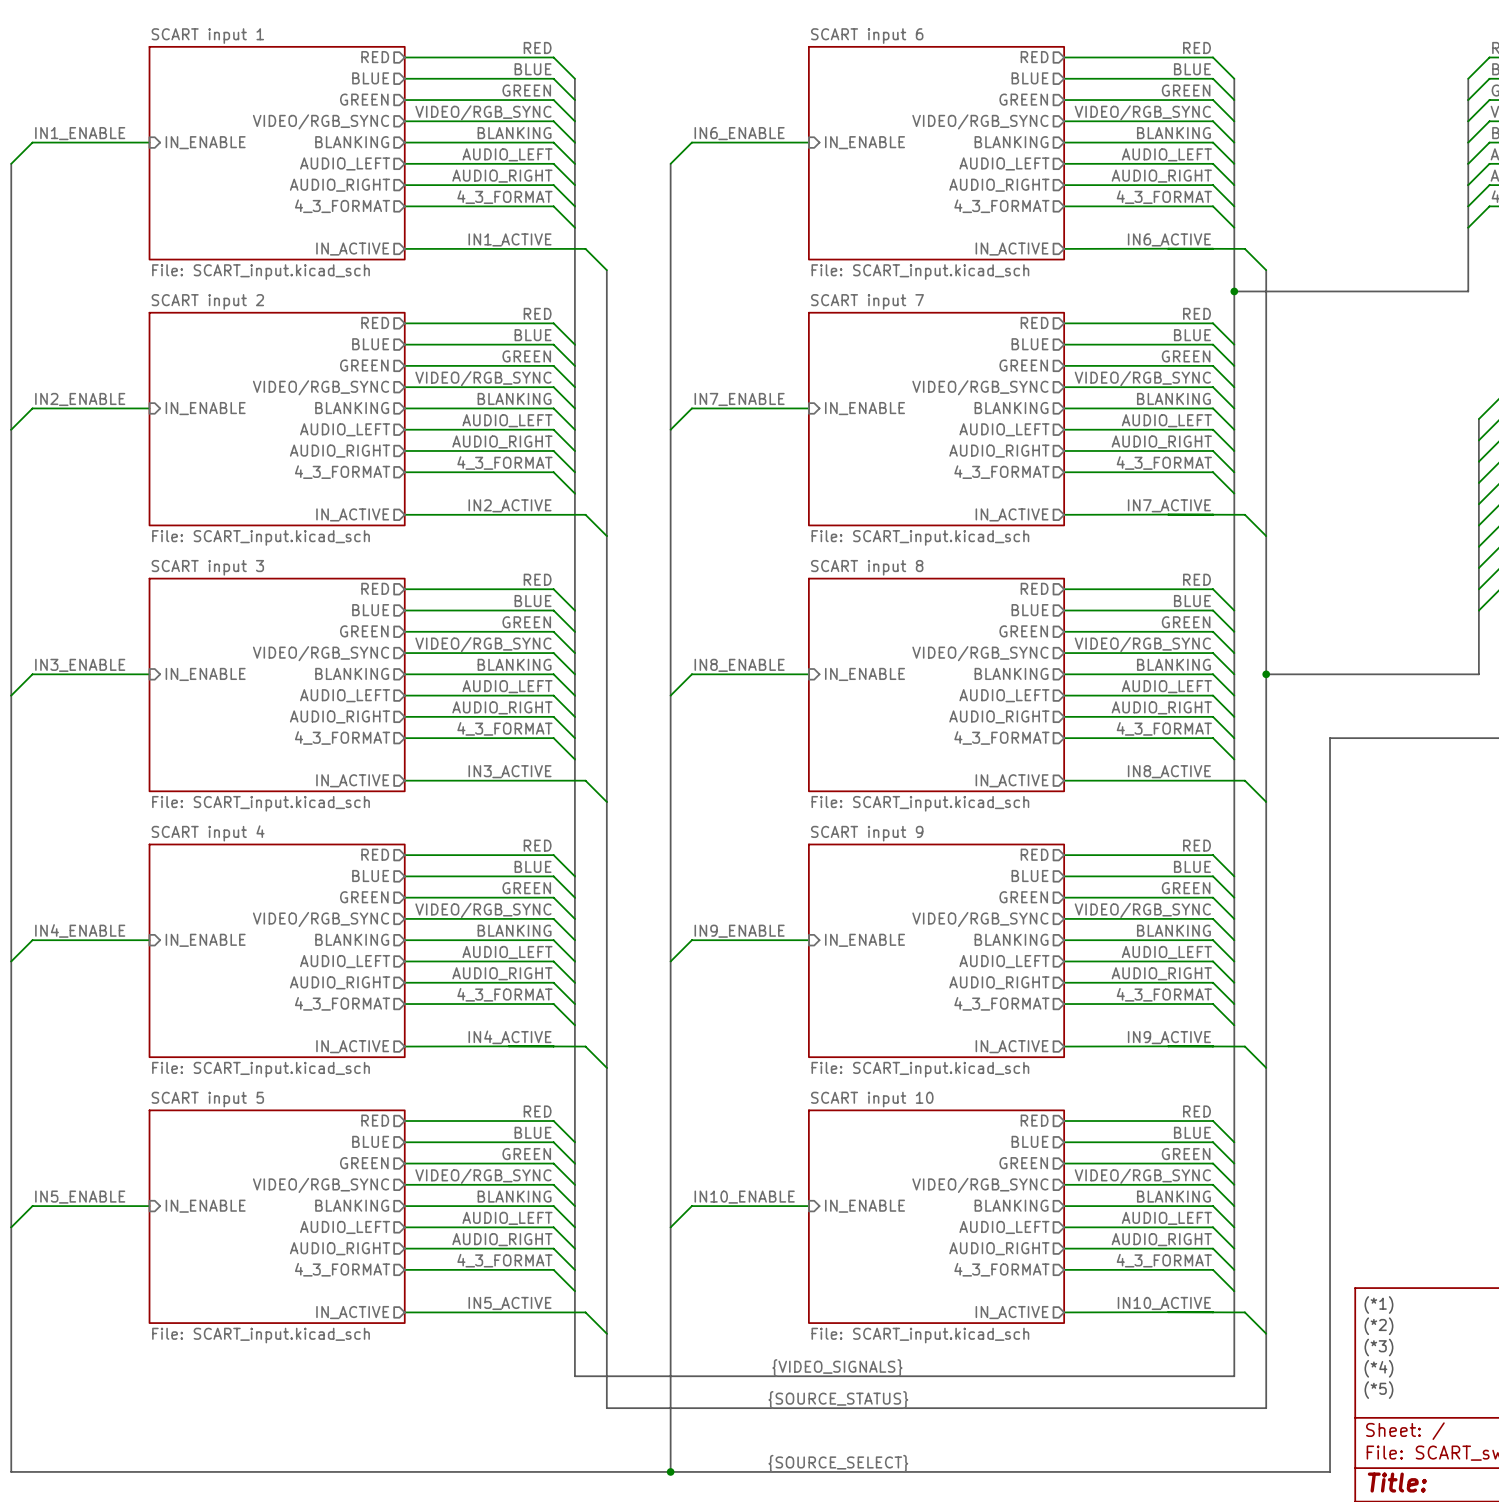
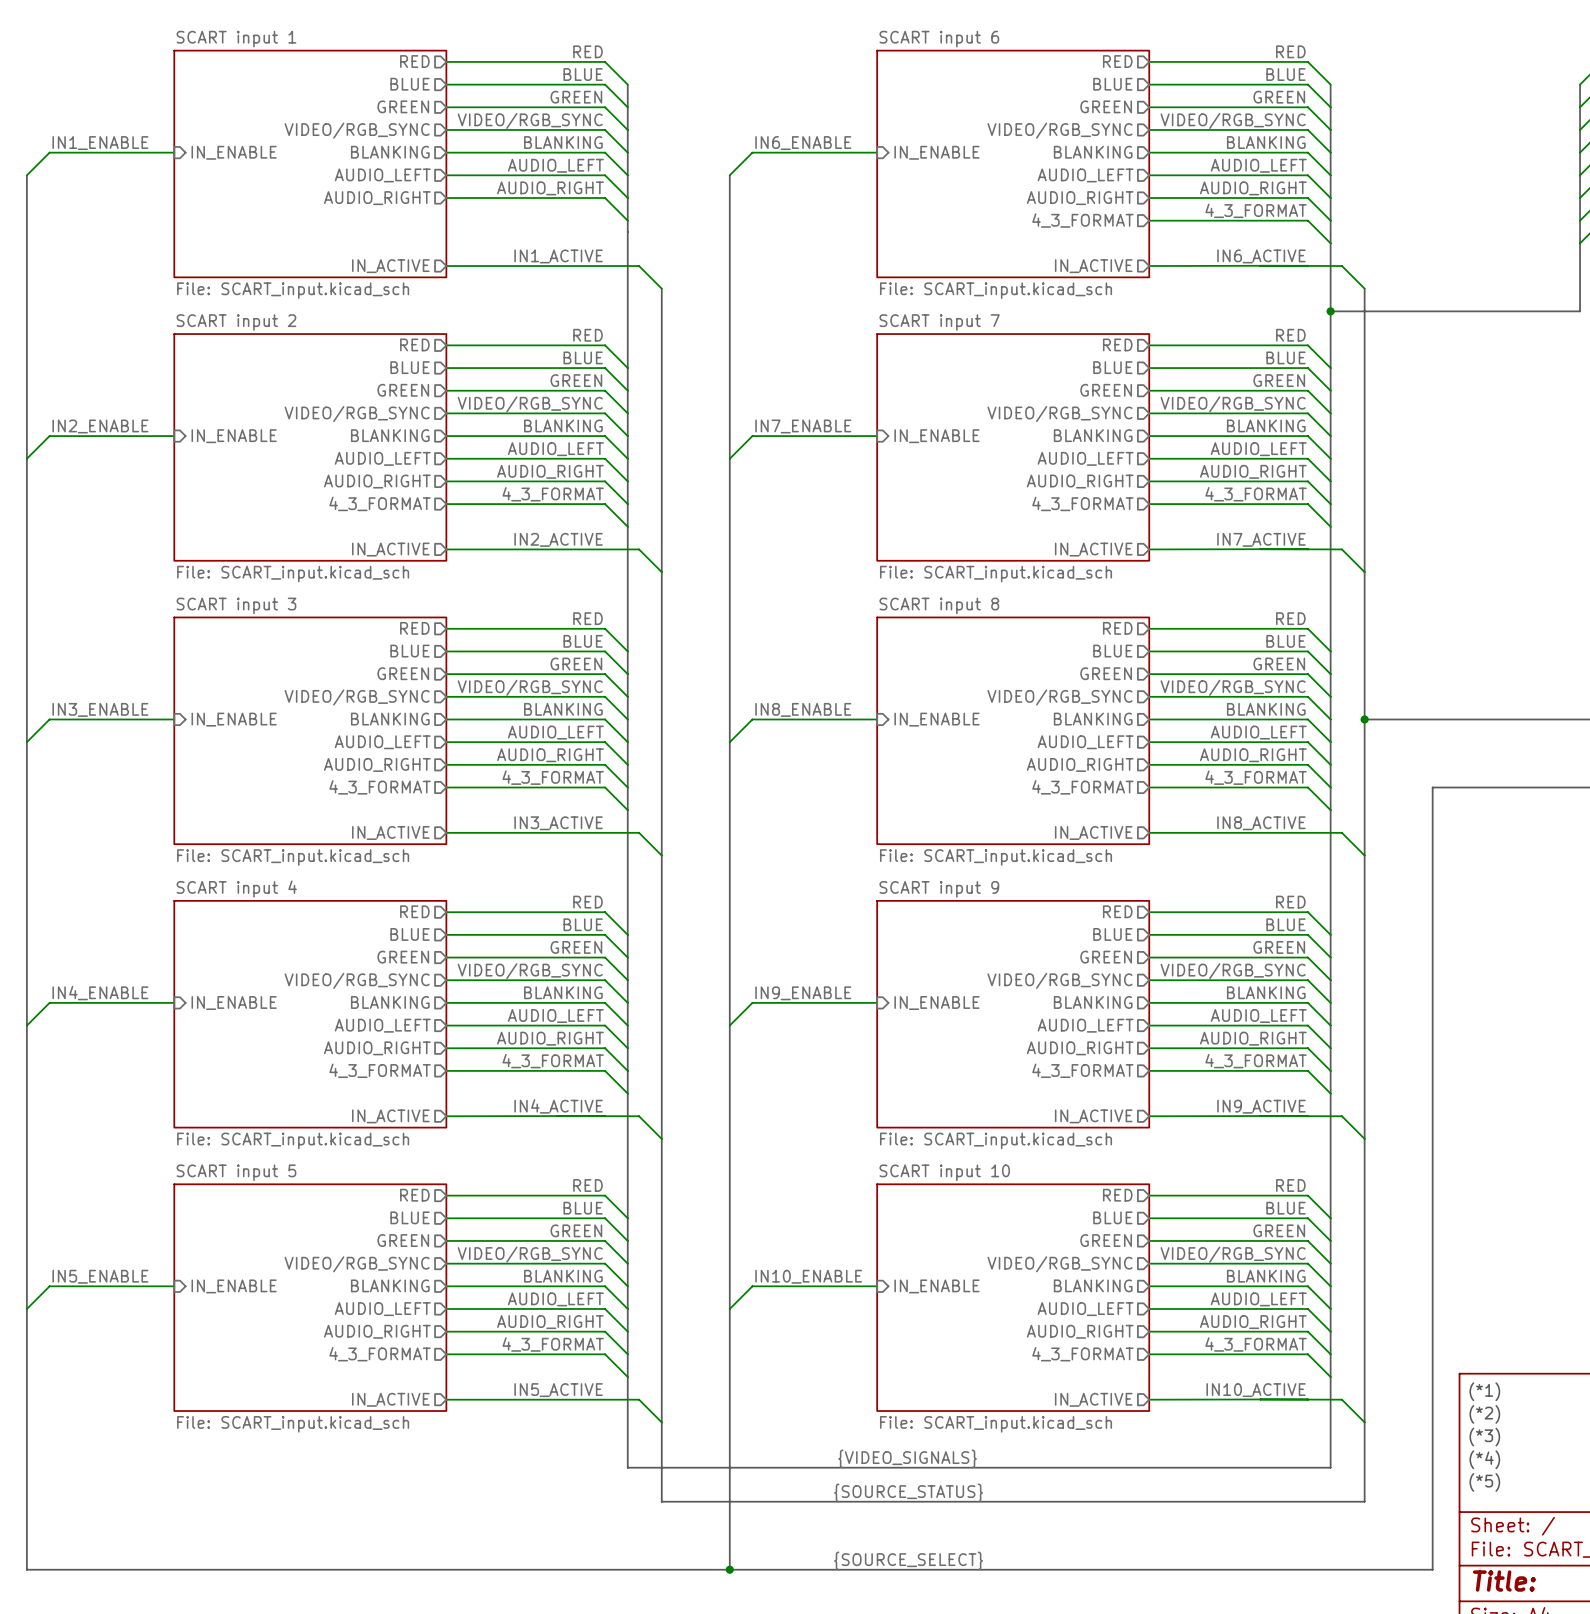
label: 4_3_FORMAT (504, 197) -> none
sheet pin: 4_3_FORMAT (342, 206) -> none
wire: (404, 206) (553, 206) (574, 227) -> none

